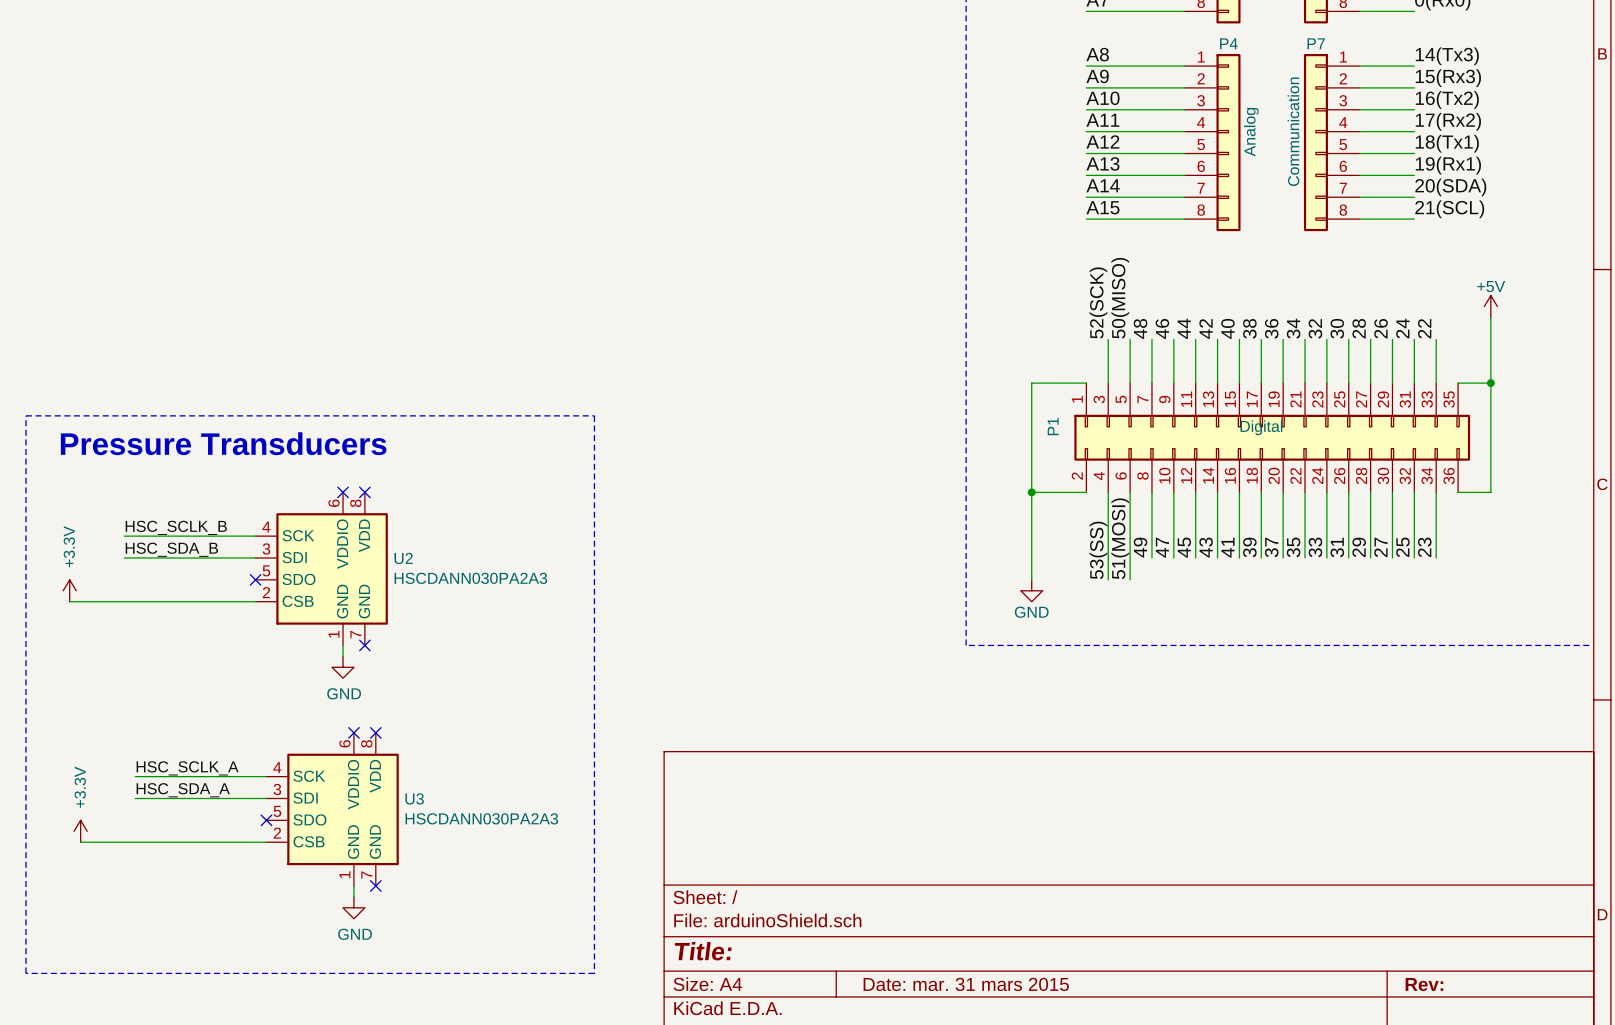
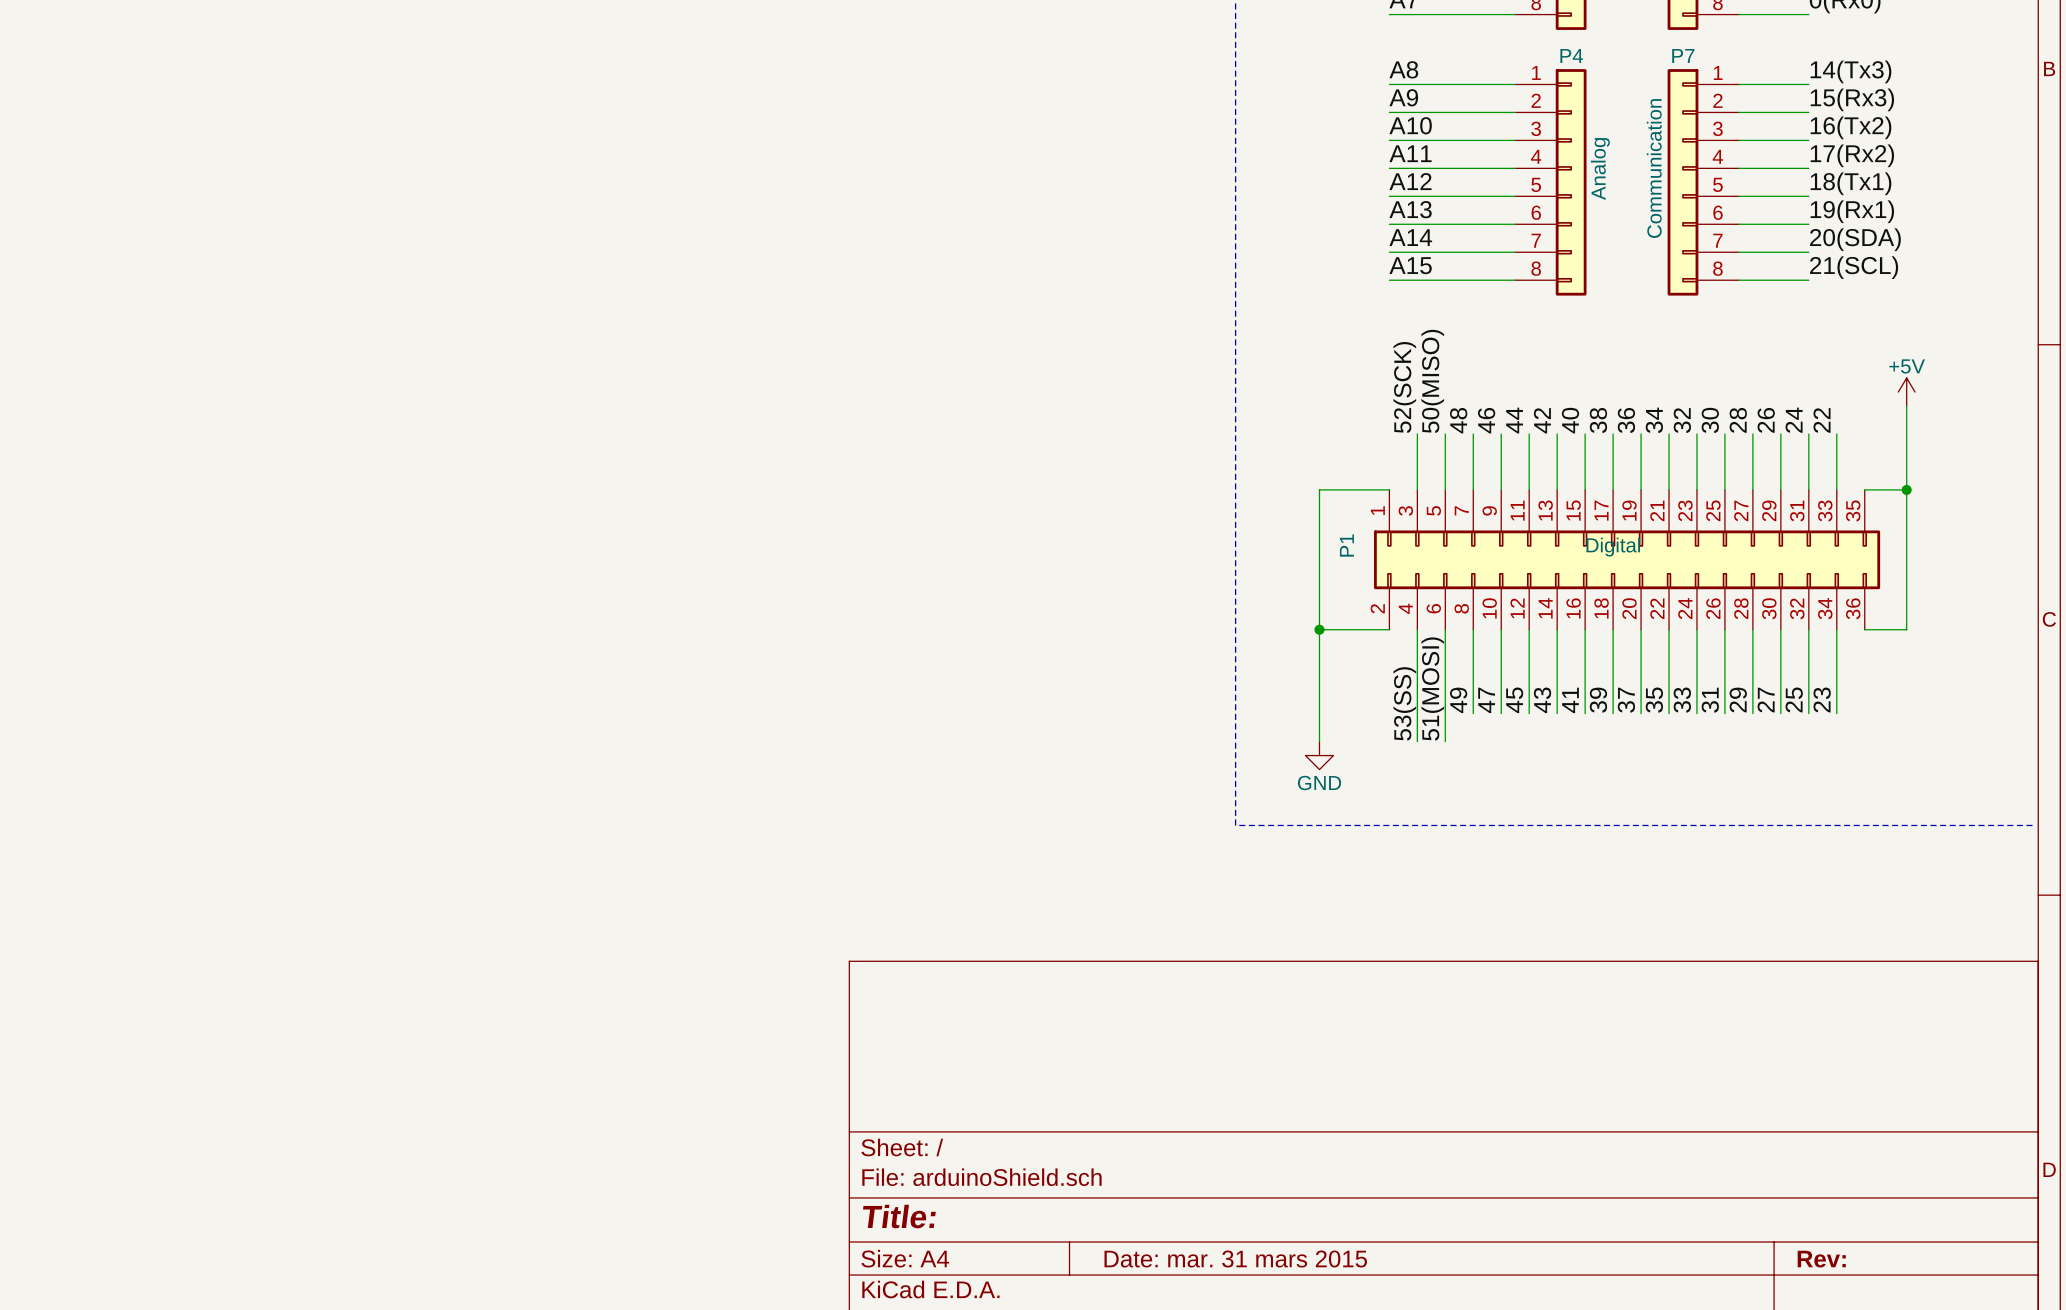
line: (25, 415) (594, 415) (594, 973) (25, 973) (25, 415) -> none
text: Pressure Transducers (223, 443) -> none
no-connect mark: (343, 492) -> none
no-connect mark: (364, 492) -> none
label: HSC_SCLK_B (176, 527) -> none
wire: (124, 536) (255, 536) -> none
label: HSC_SDA_B (171, 549) -> none
wire: (124, 557) (255, 557) -> none
U2: HSCDANN030PA2A3 (321, 568) -> none
no-connect mark: (255, 579) -> none
power symbol: +3.3V (69, 590) -> none
wire: (69, 601) (255, 601) -> none
wire: (343, 645) (343, 656) -> none
no-connect mark: (364, 645) -> none
power symbol: GND (343, 667) -> none
no-connect mark: (353, 732) -> none
no-connect mark: (375, 732) -> none
label: HSC_SCLK_A (187, 768) -> none
wire: (135, 776) (266, 776) -> none
label: HSC_SDA_A (183, 790) -> none
wire: (135, 798) (266, 798) -> none
U3: HSCDANN030PA2A3 (332, 809) -> none
no-connect mark: (266, 820) -> none
power symbol: +3.3V (80, 831) -> none
wire: (80, 842) (266, 842) -> none
wire: (353, 885) (353, 896) -> none
no-connect mark: (375, 885) -> none
power symbol: GND (353, 907) -> none

